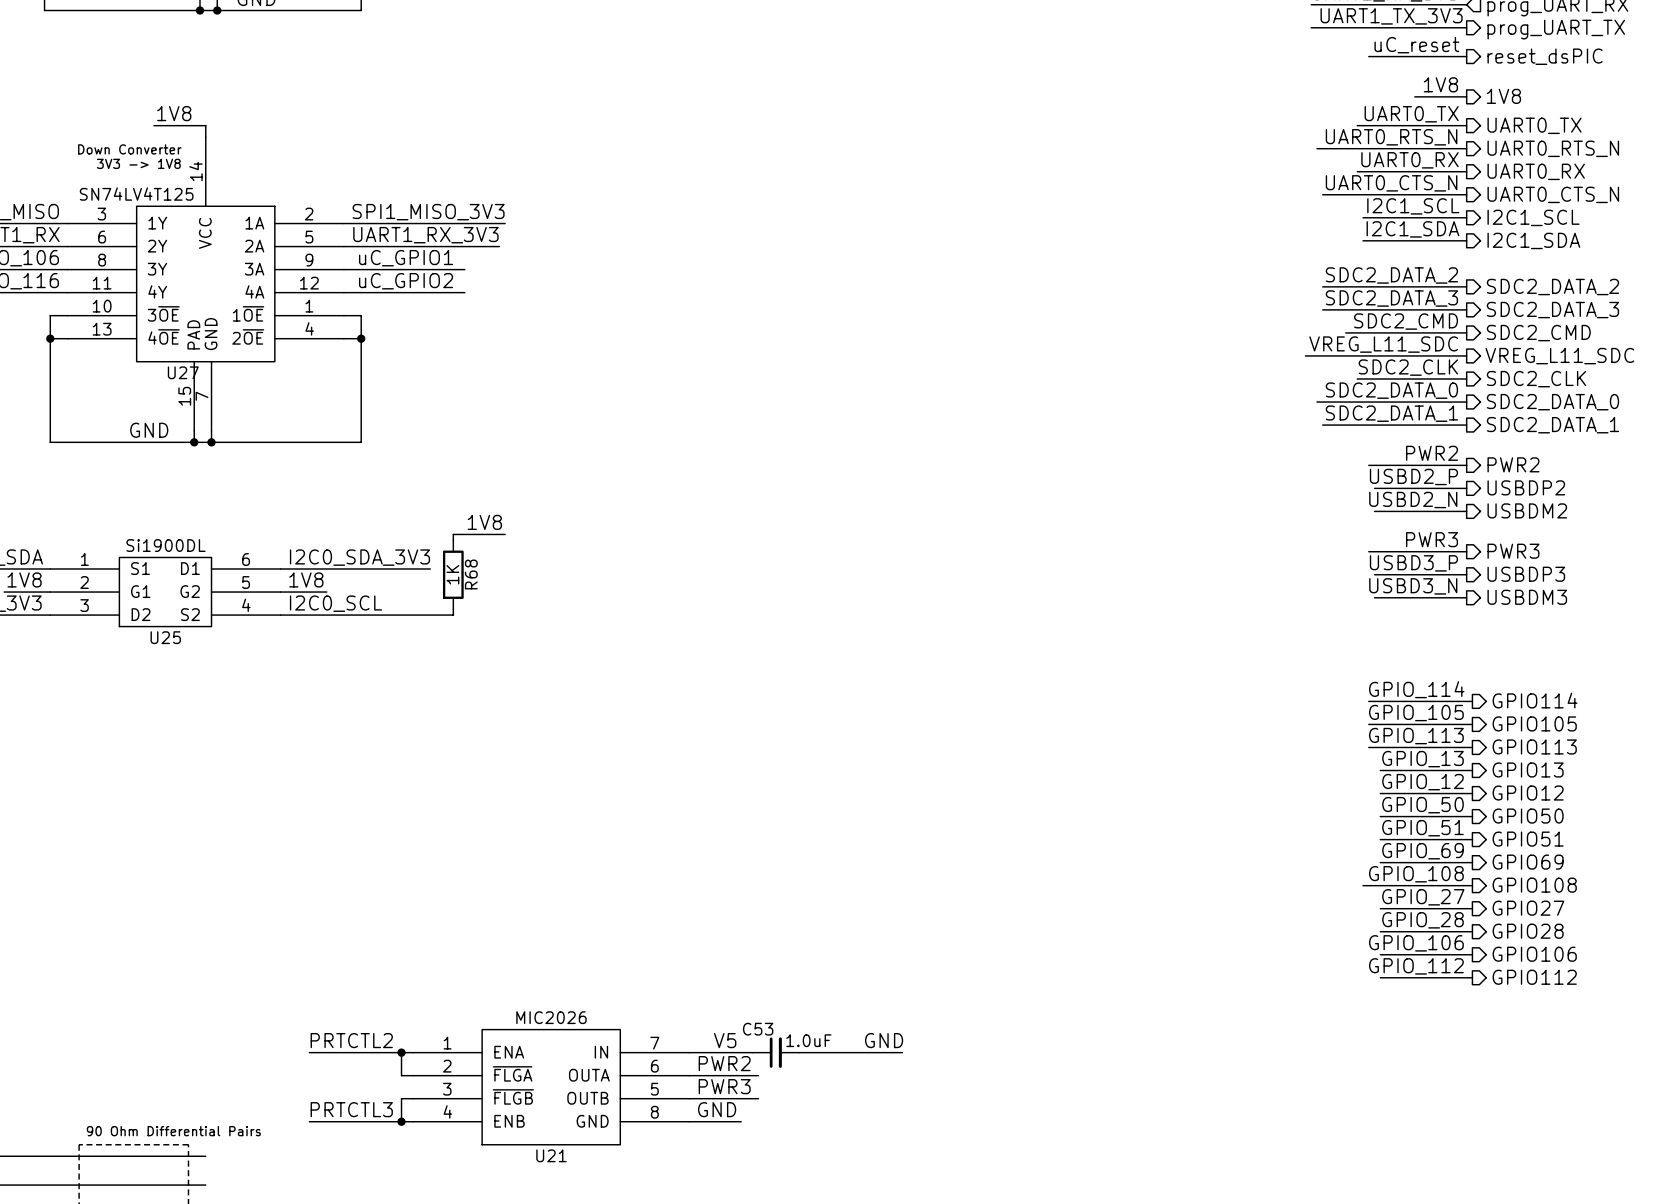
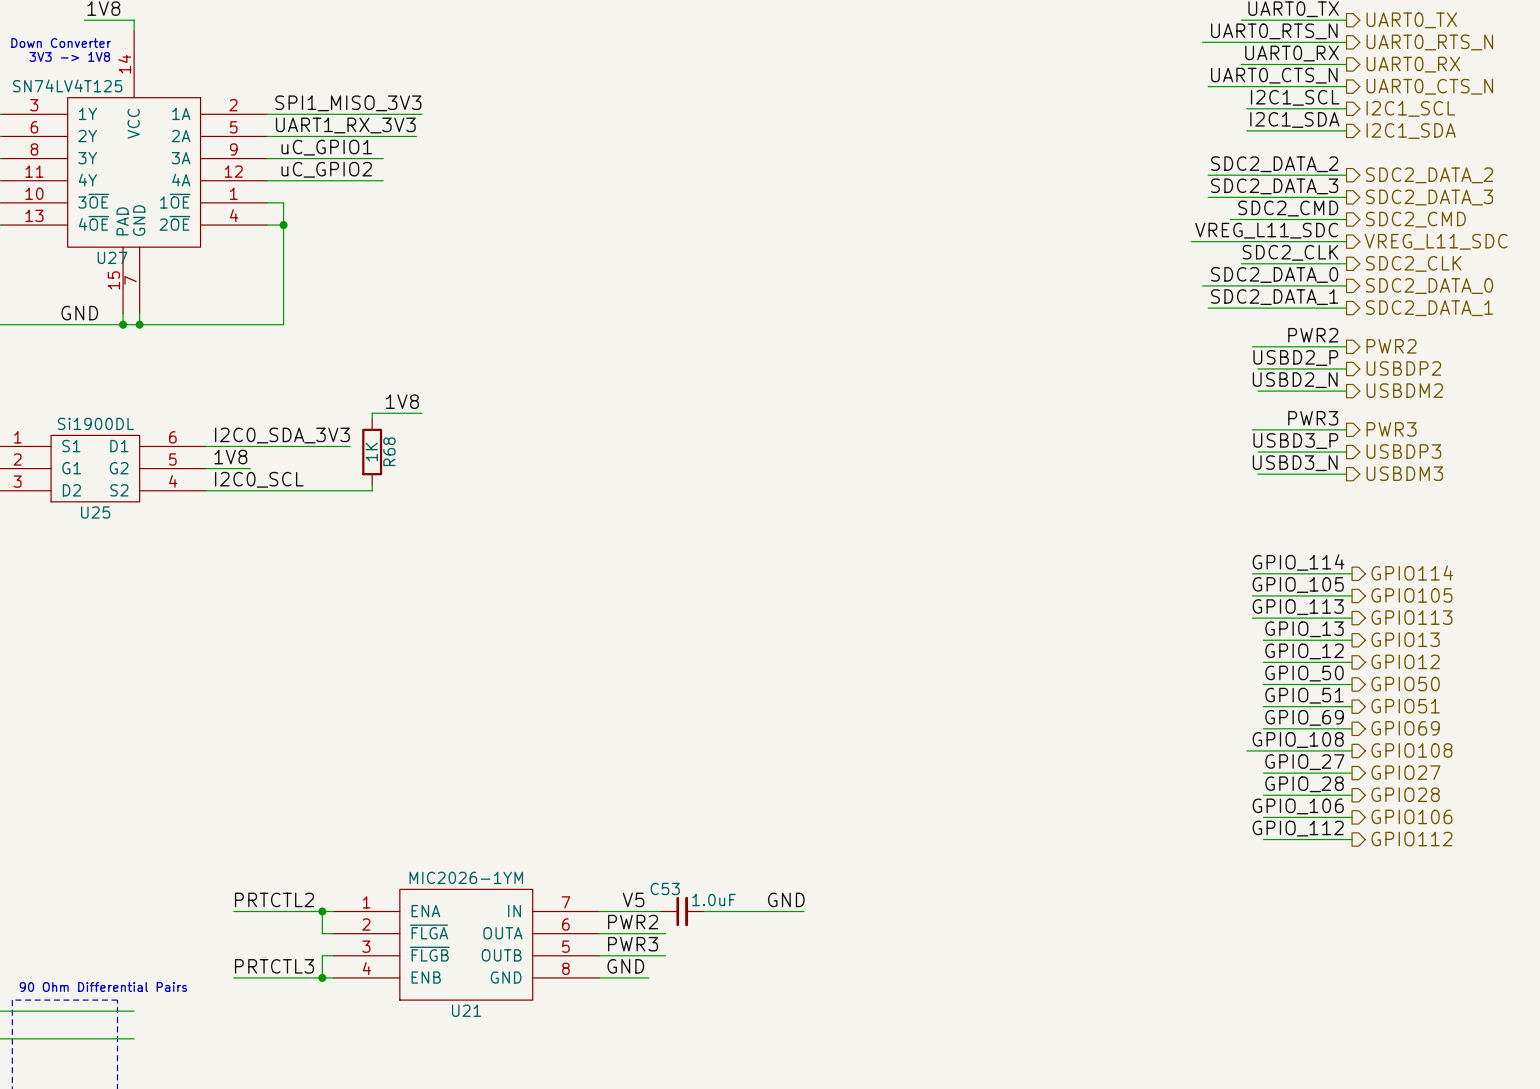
U21 value: MIC2026 (551, 1017) -> MIC2026-1YM (466, 877)

